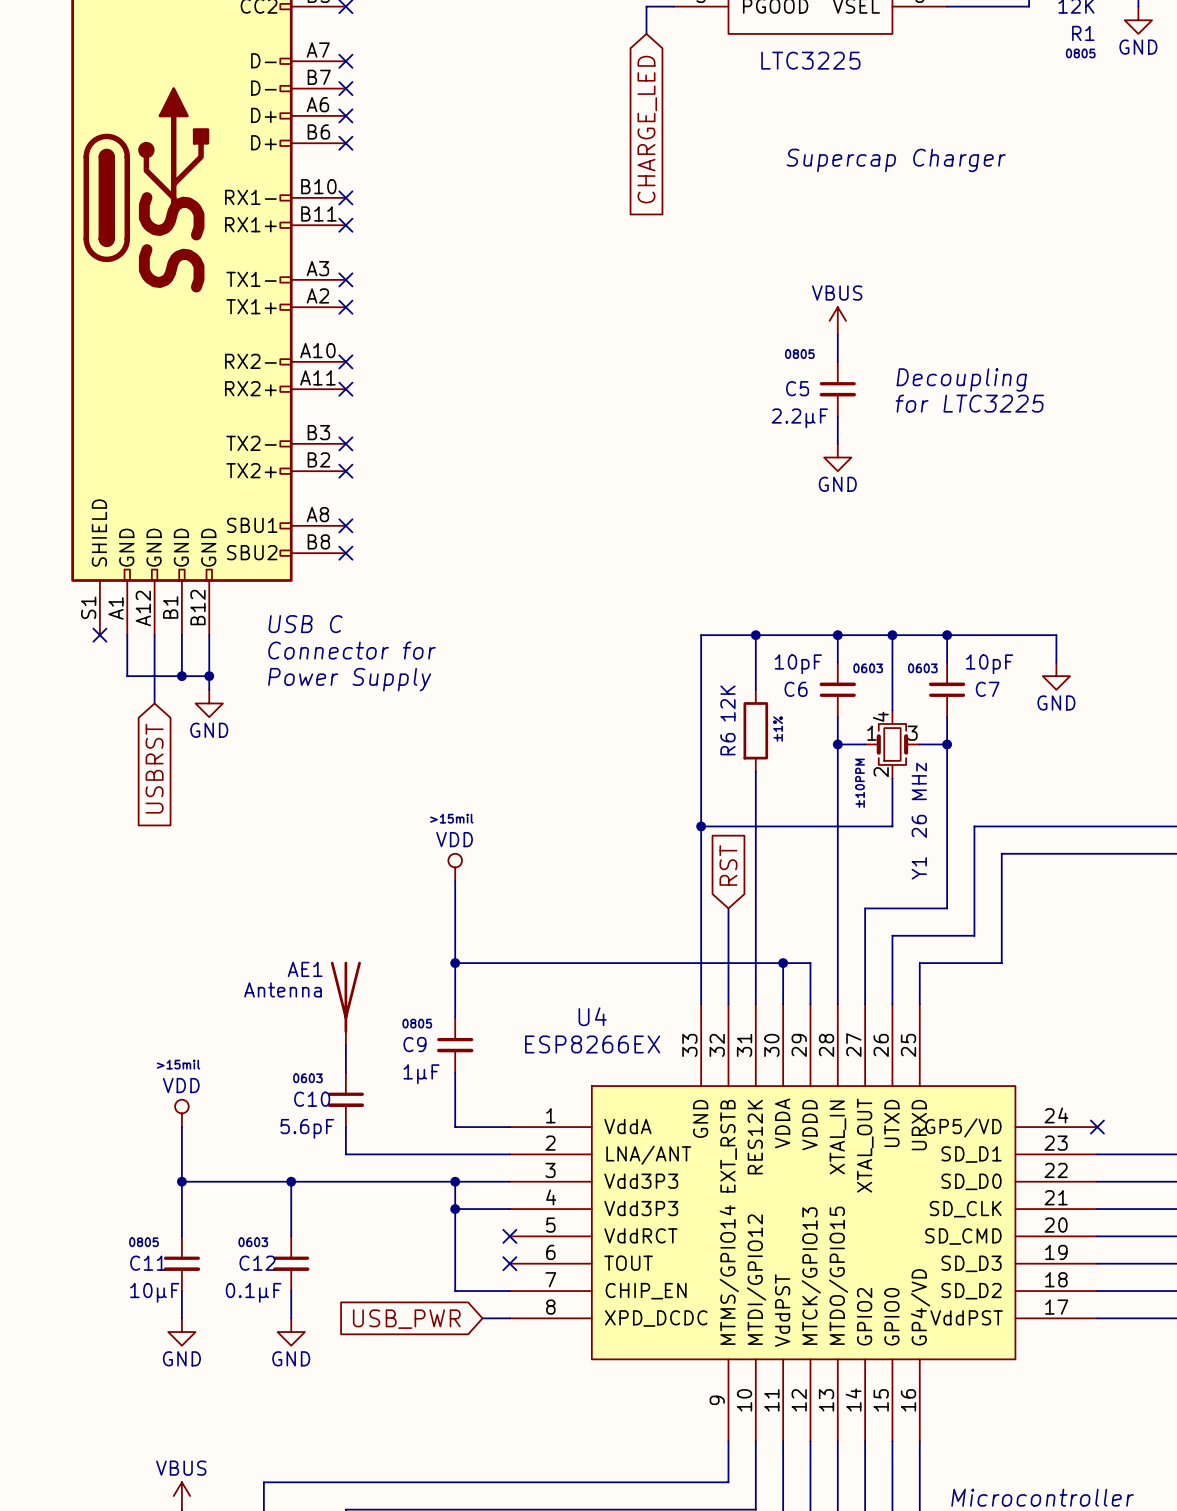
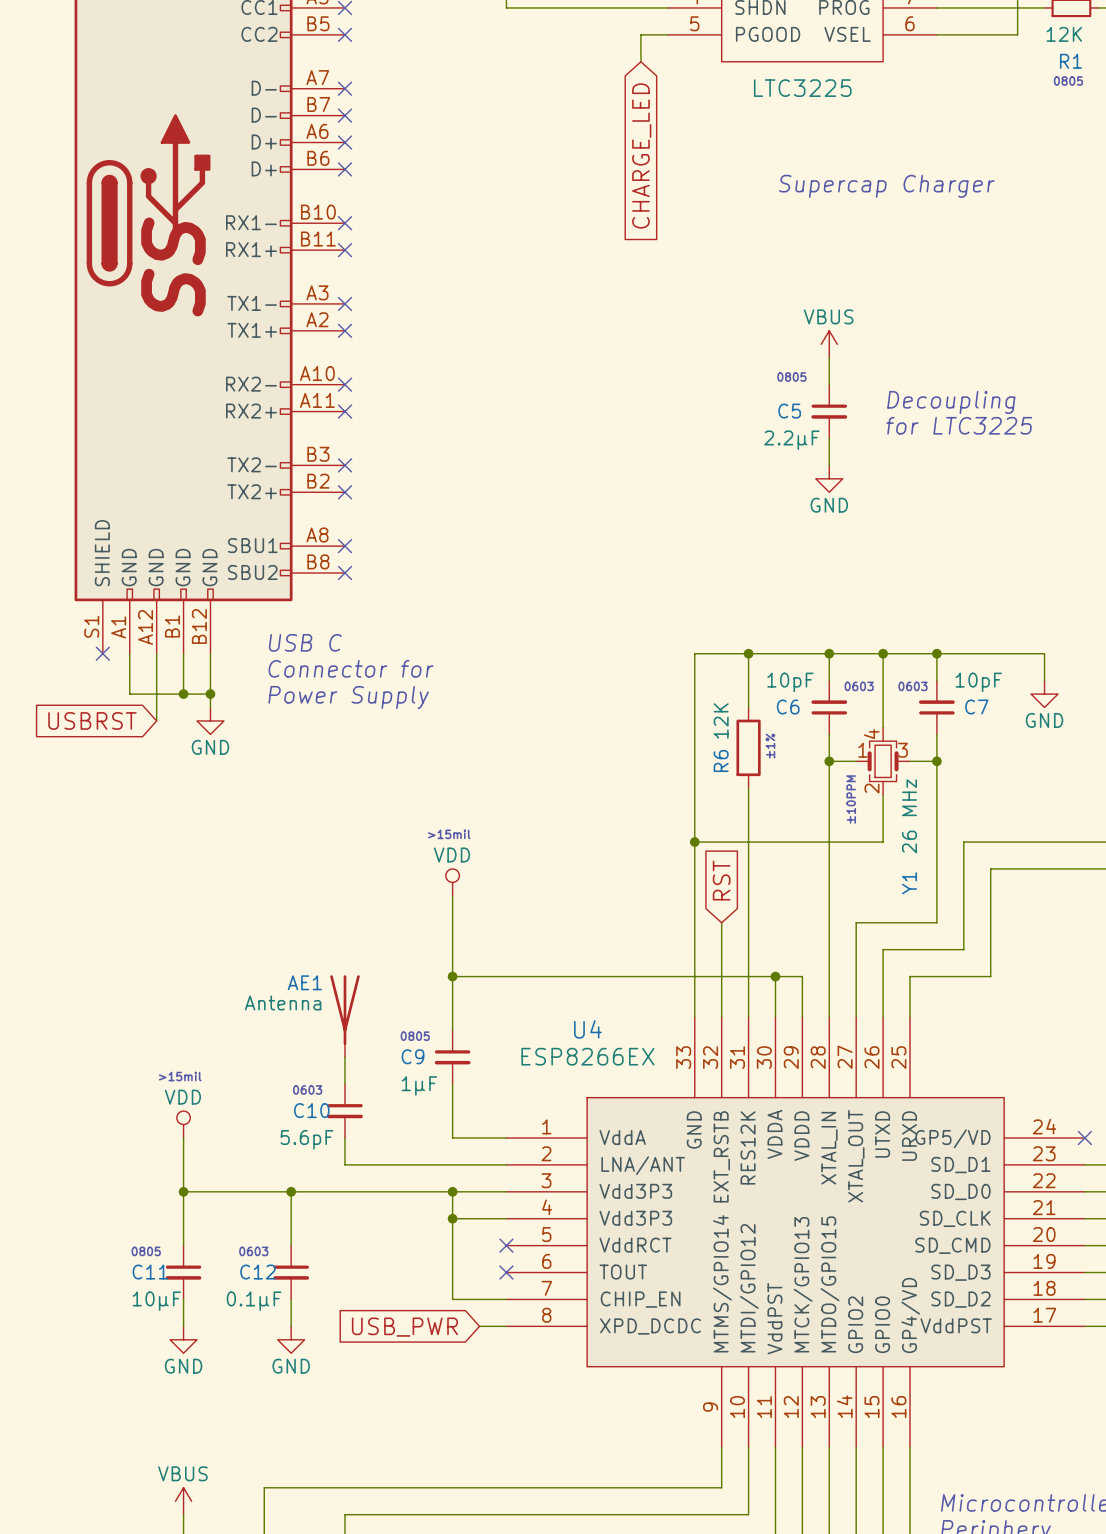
global label rotation: 0° (154, 768) -> 90° clockwise (92, 720)

